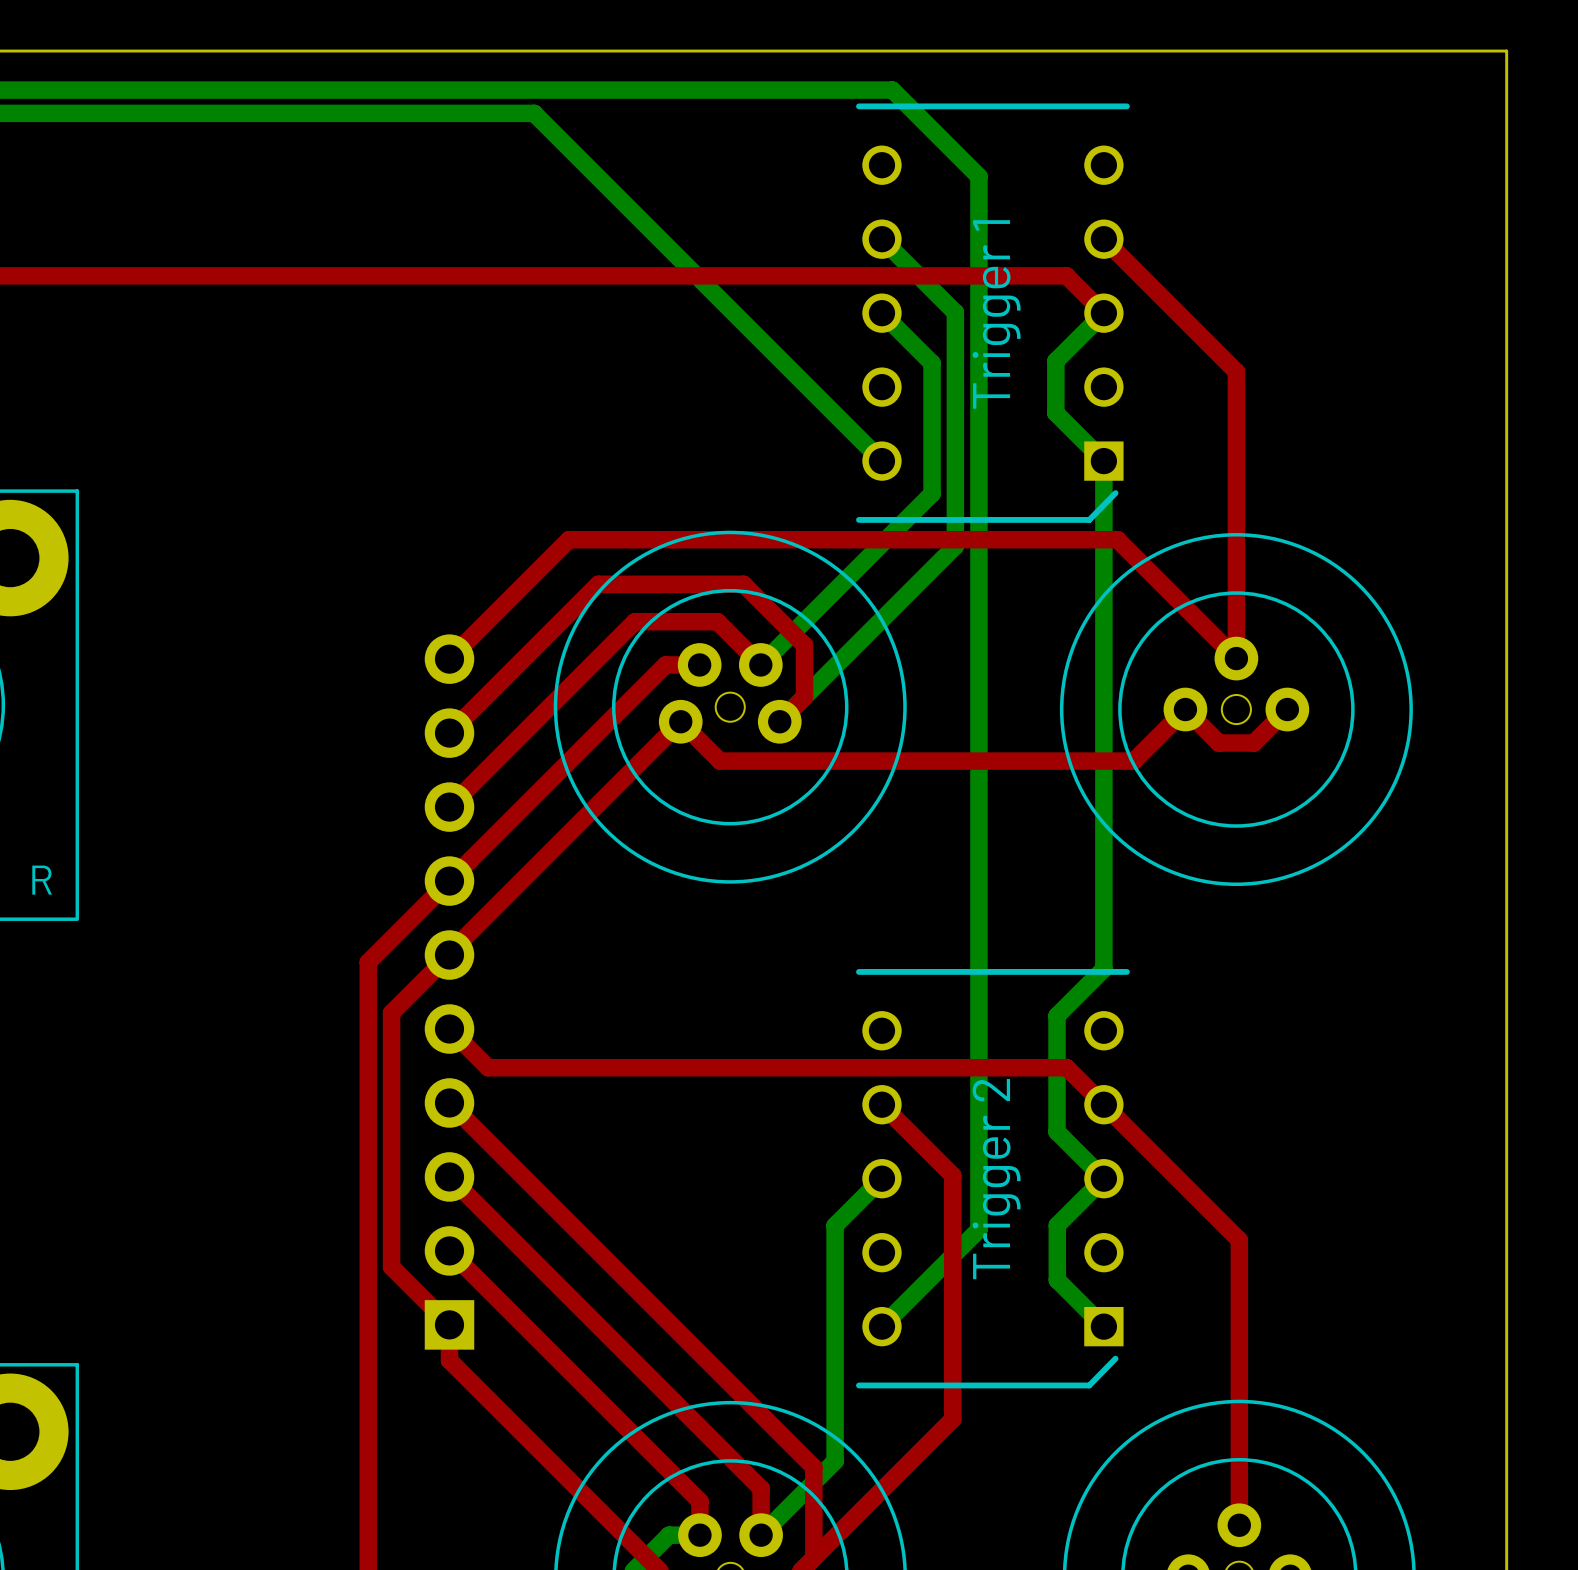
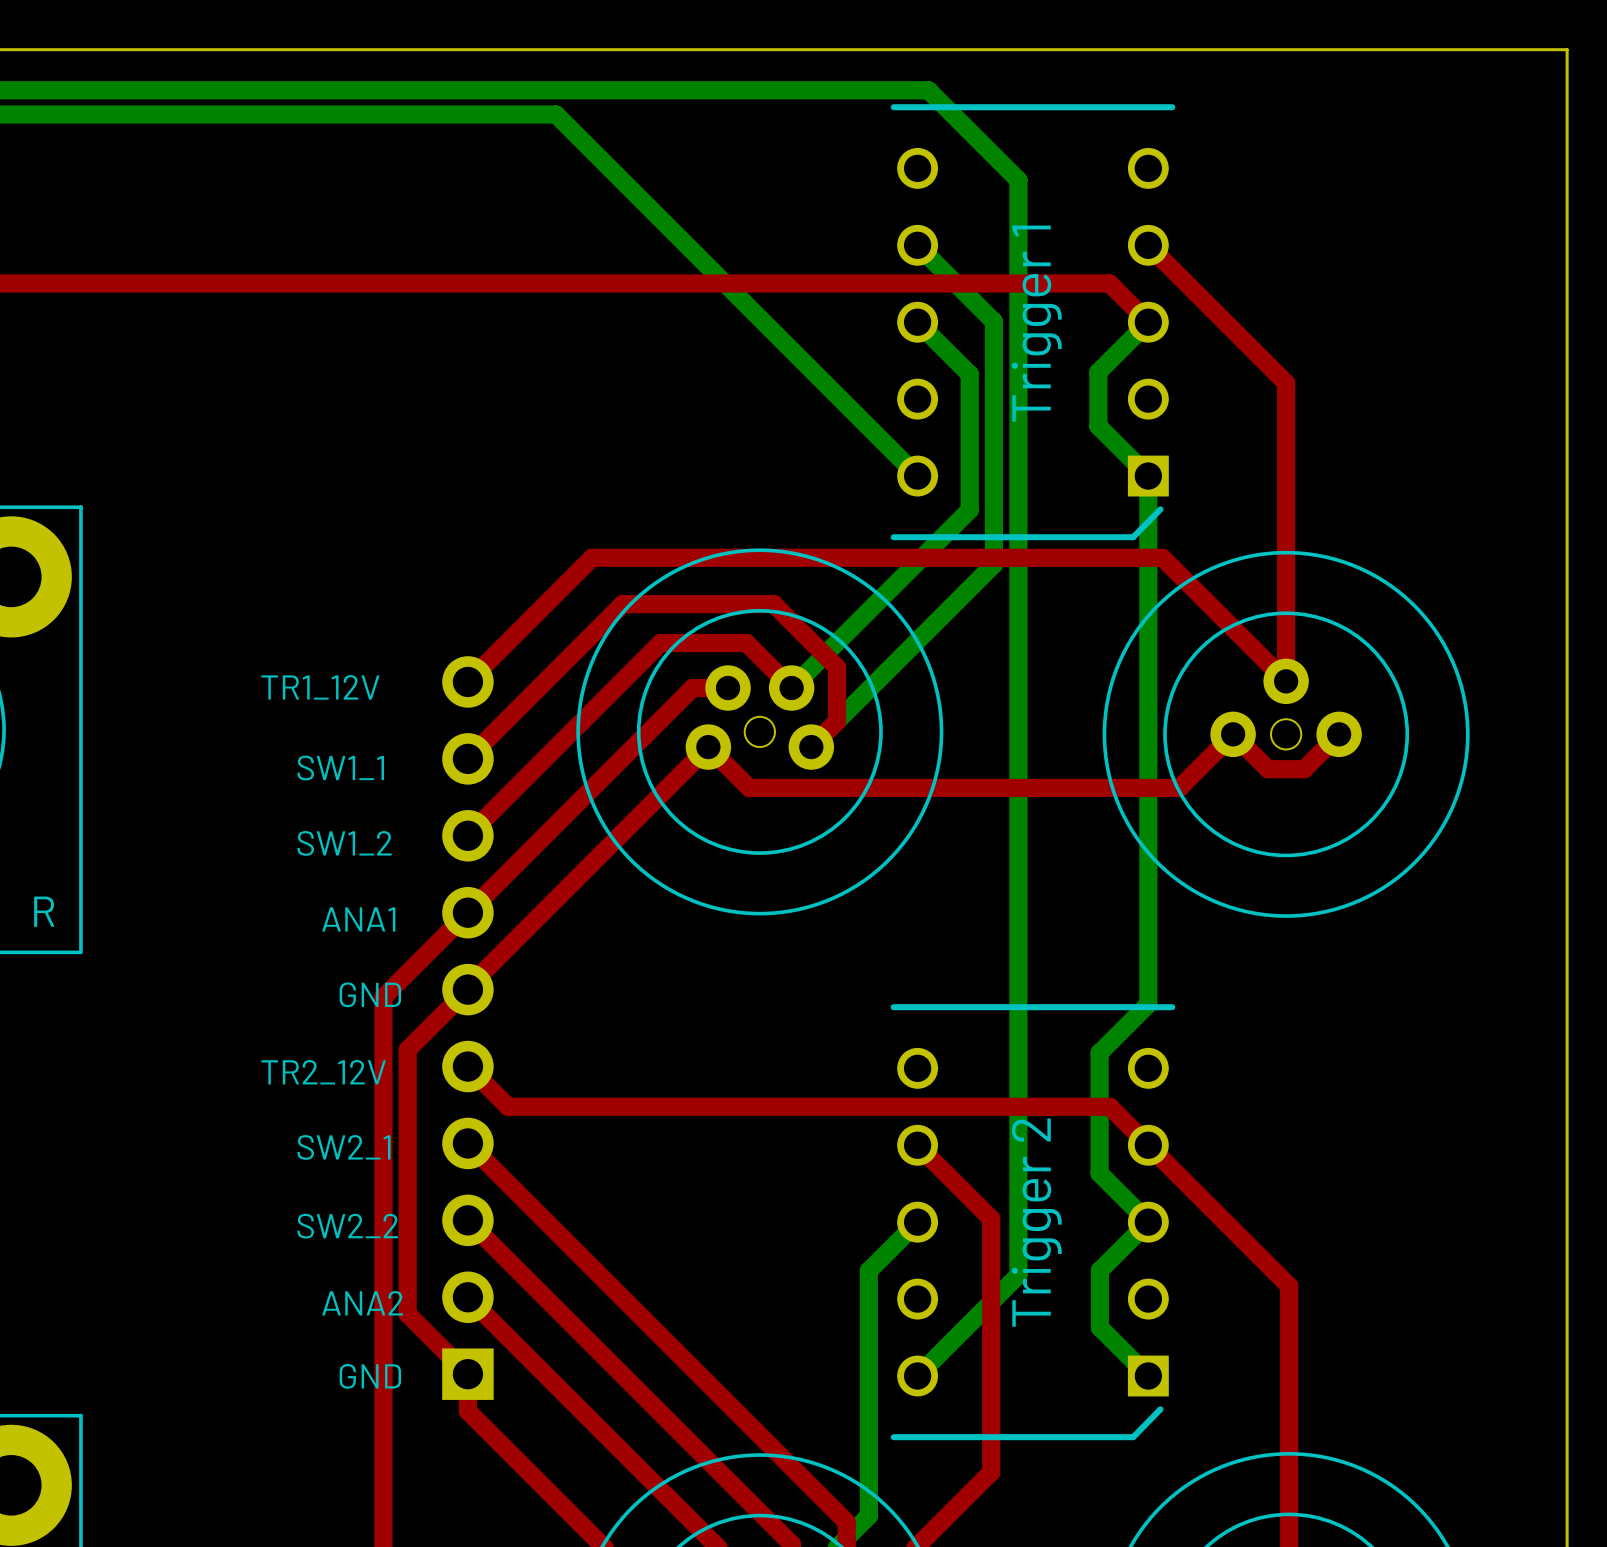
text: none -> TR1_12V (320, 687)
text: none -> SW1_1 (340, 768)
text: none -> SW1_2 (344, 843)
text: none -> ANA1 (358, 919)
text: none -> GND (370, 994)
text: none -> TR2_12V (323, 1072)
text: none -> SW2_1 (343, 1147)
text: none -> SW2_2 (347, 1226)
text: none -> ANA2 (362, 1303)
text: none -> GND (370, 1376)

